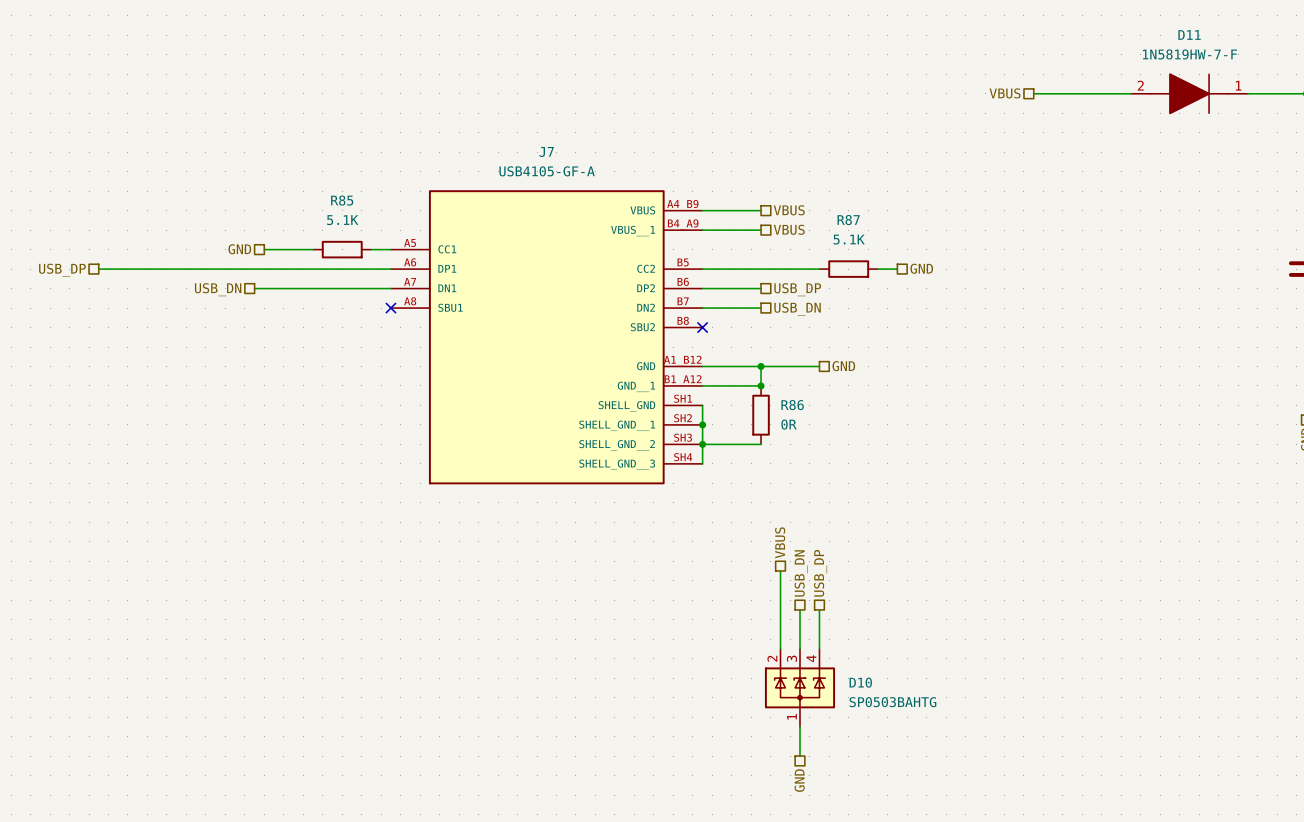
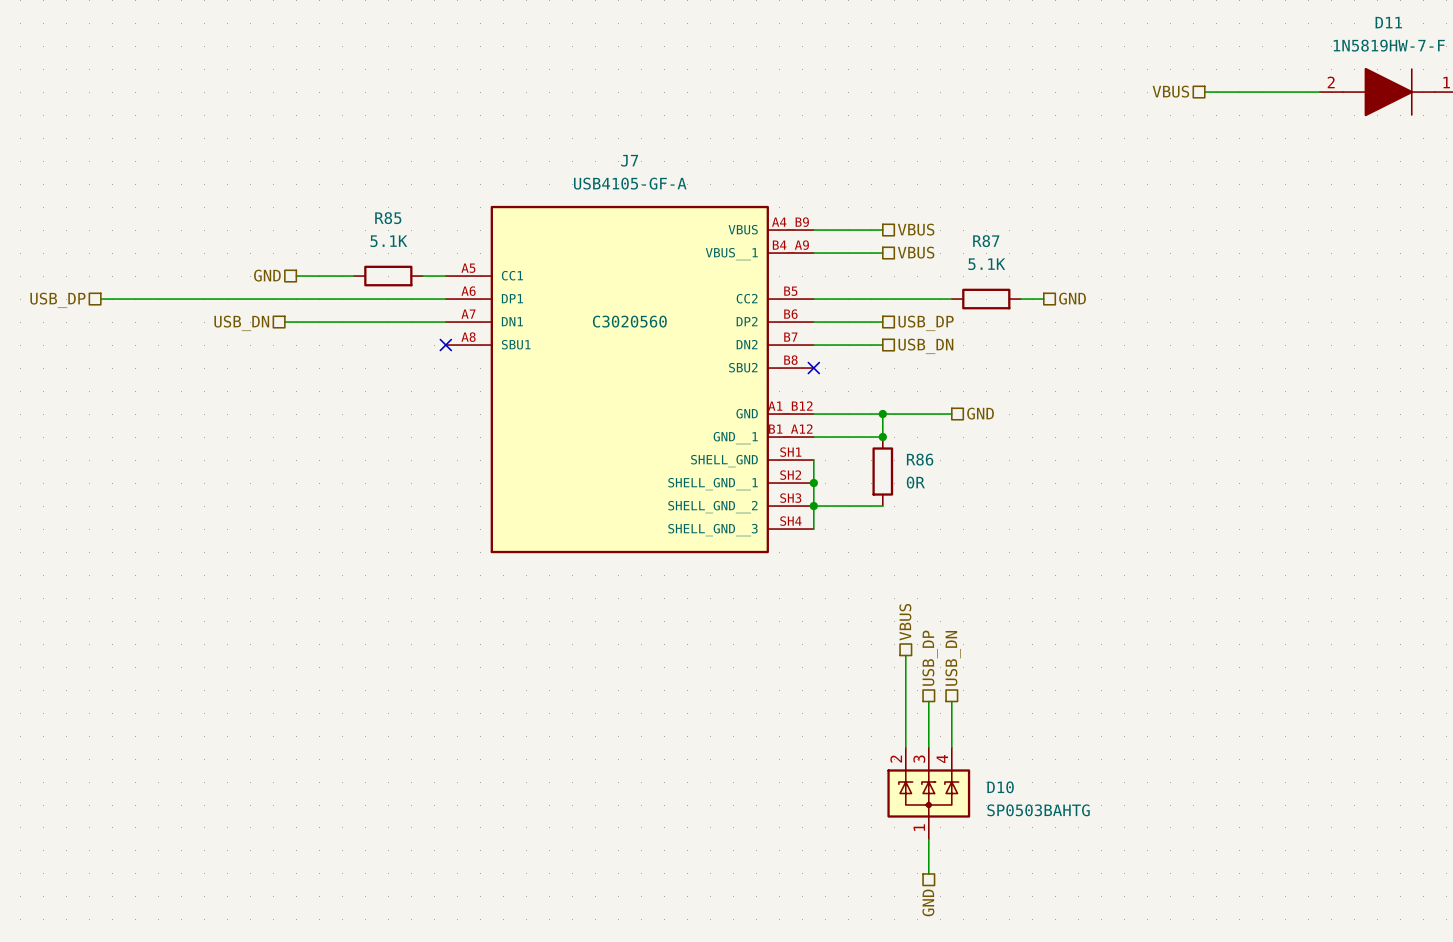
J7 text: none -> C3020560 (629, 321)
hierarchical label: USB_DN (801, 573) -> USB_DP (930, 658)
hierarchical label: USB_DP (820, 573) -> USB_DN (953, 658)

